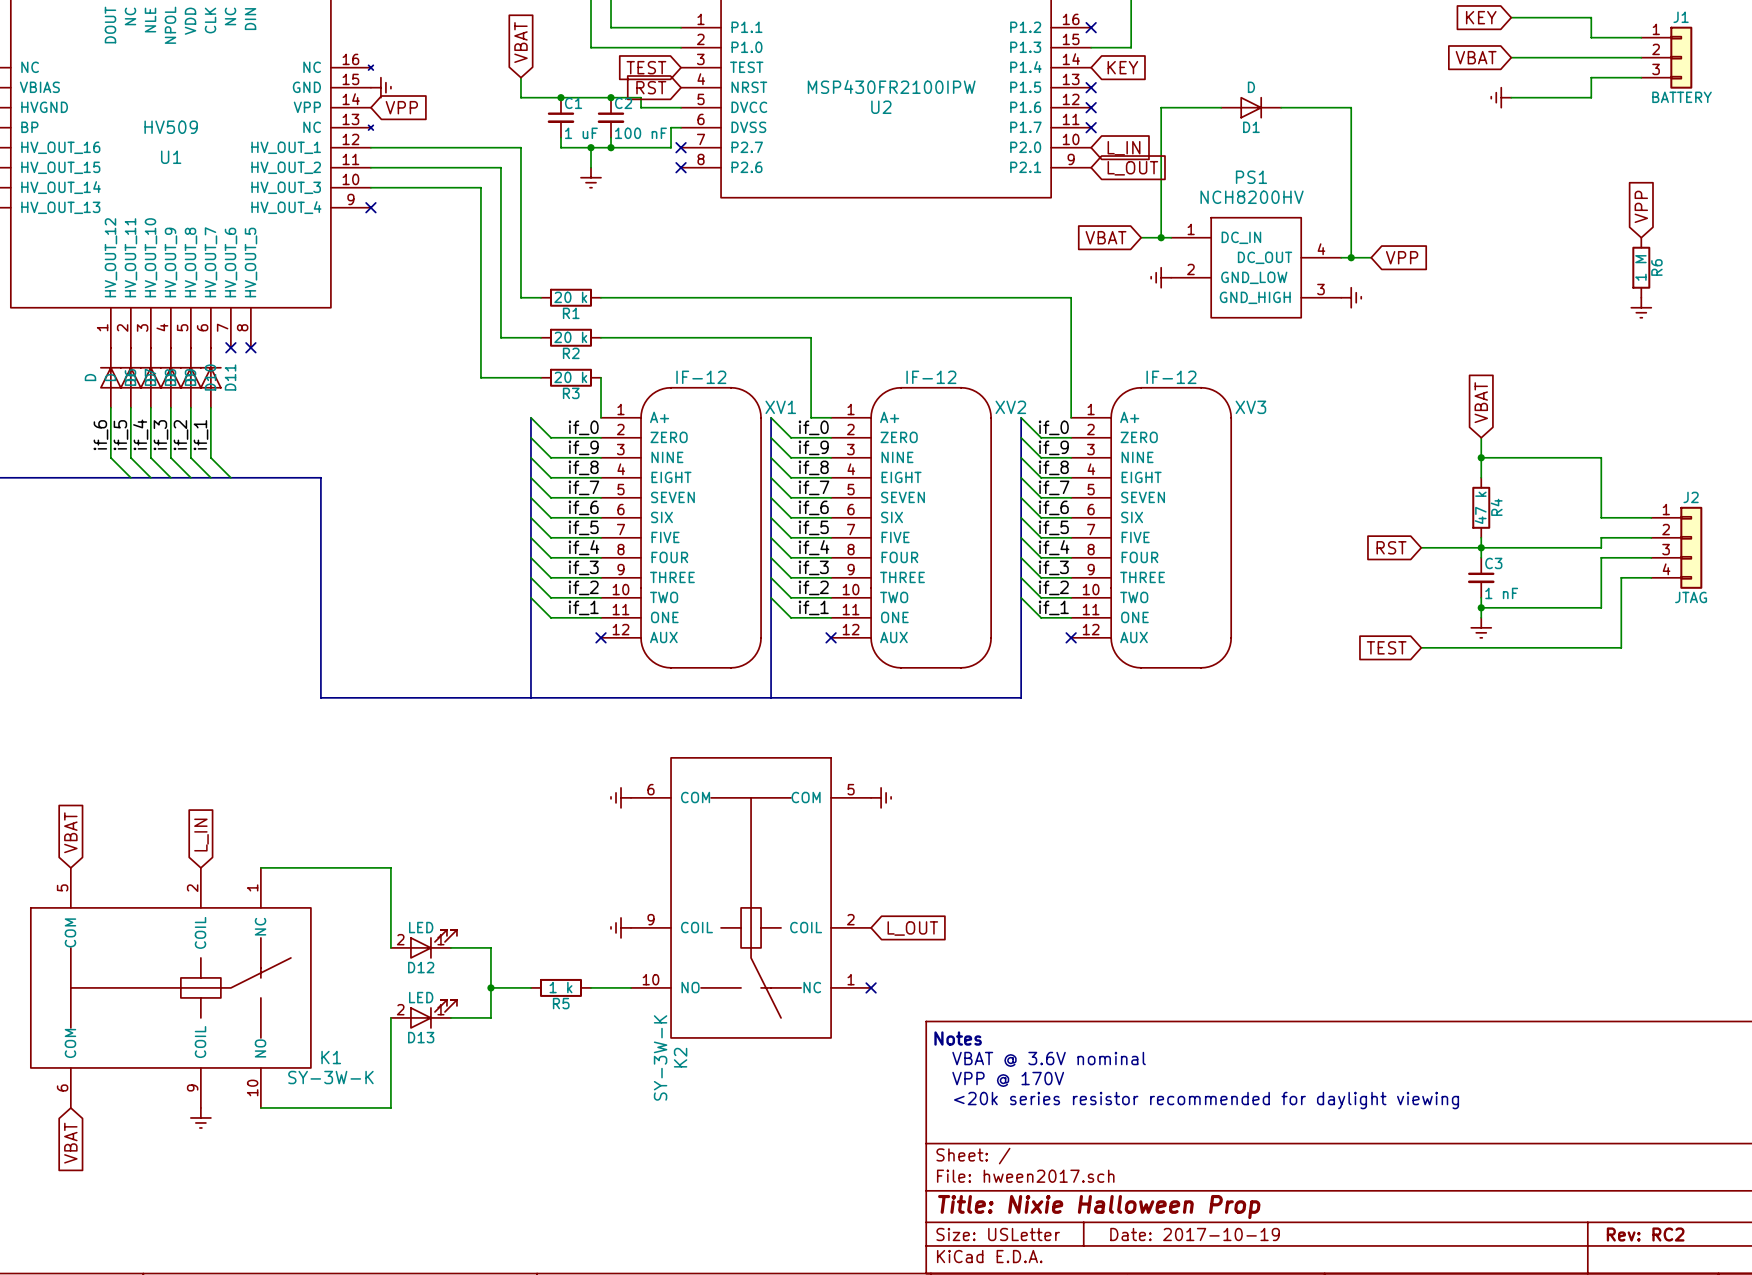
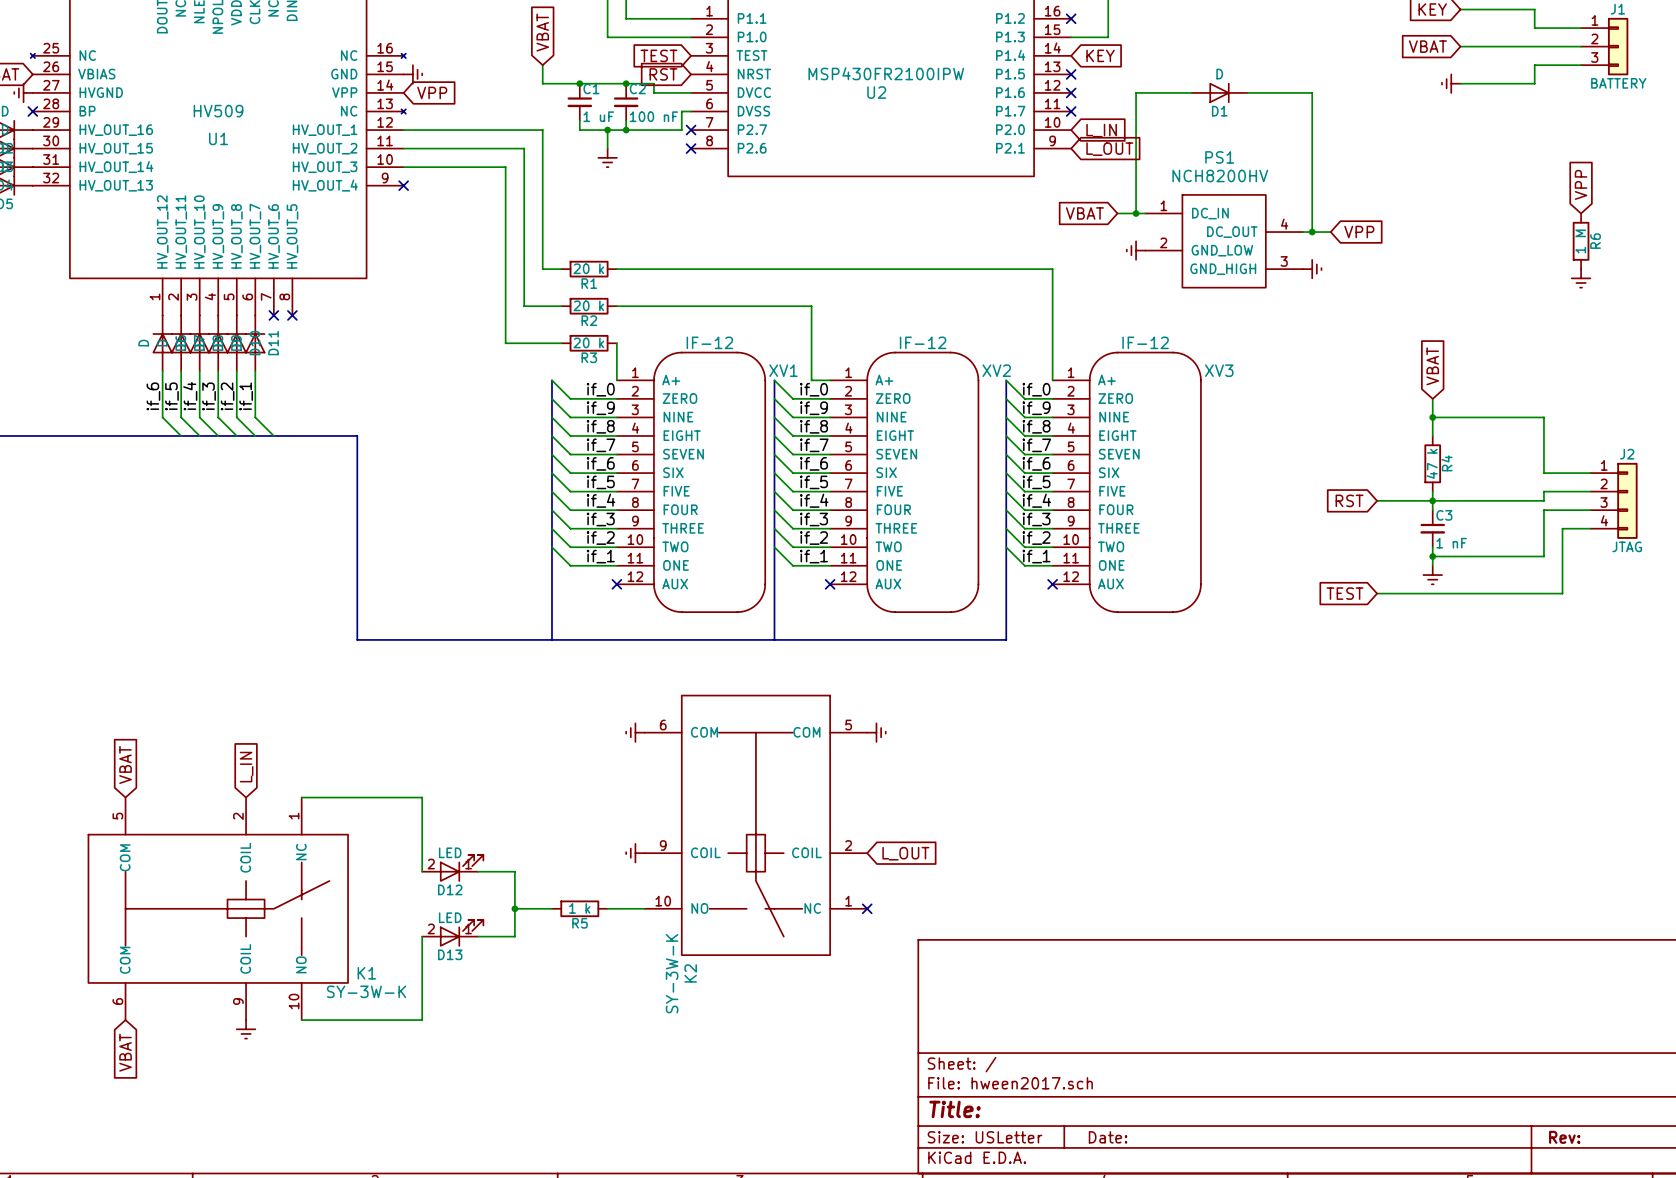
text: Notes (958, 1038) -> none
text: VBAT @ 3.6V nominal (1049, 1059) -> none
text: VPP @ 170V (1008, 1079) -> none
text: <20k series resistor recommended for daylight viewing (1206, 1100) -> none
title block: Title: Nixie Halloween Prop (1099, 1207) -> Title: (955, 1109)
title block: Date: 2017-10-19 (1195, 1234) -> Date: (1108, 1137)
title block: Rev: RC2 (1645, 1234) -> Rev: (1564, 1137)

